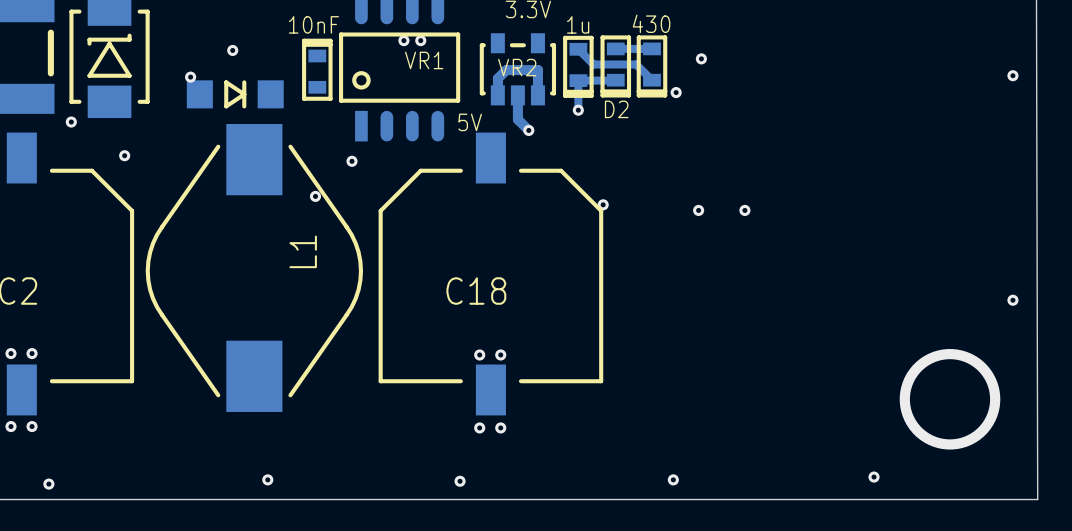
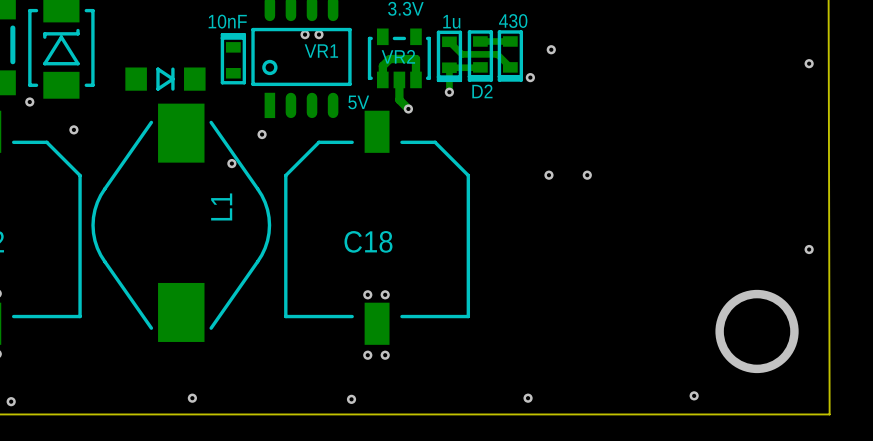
via: (232, 50) -> none
via: (190, 77) -> none
via: (603, 204) -> none

